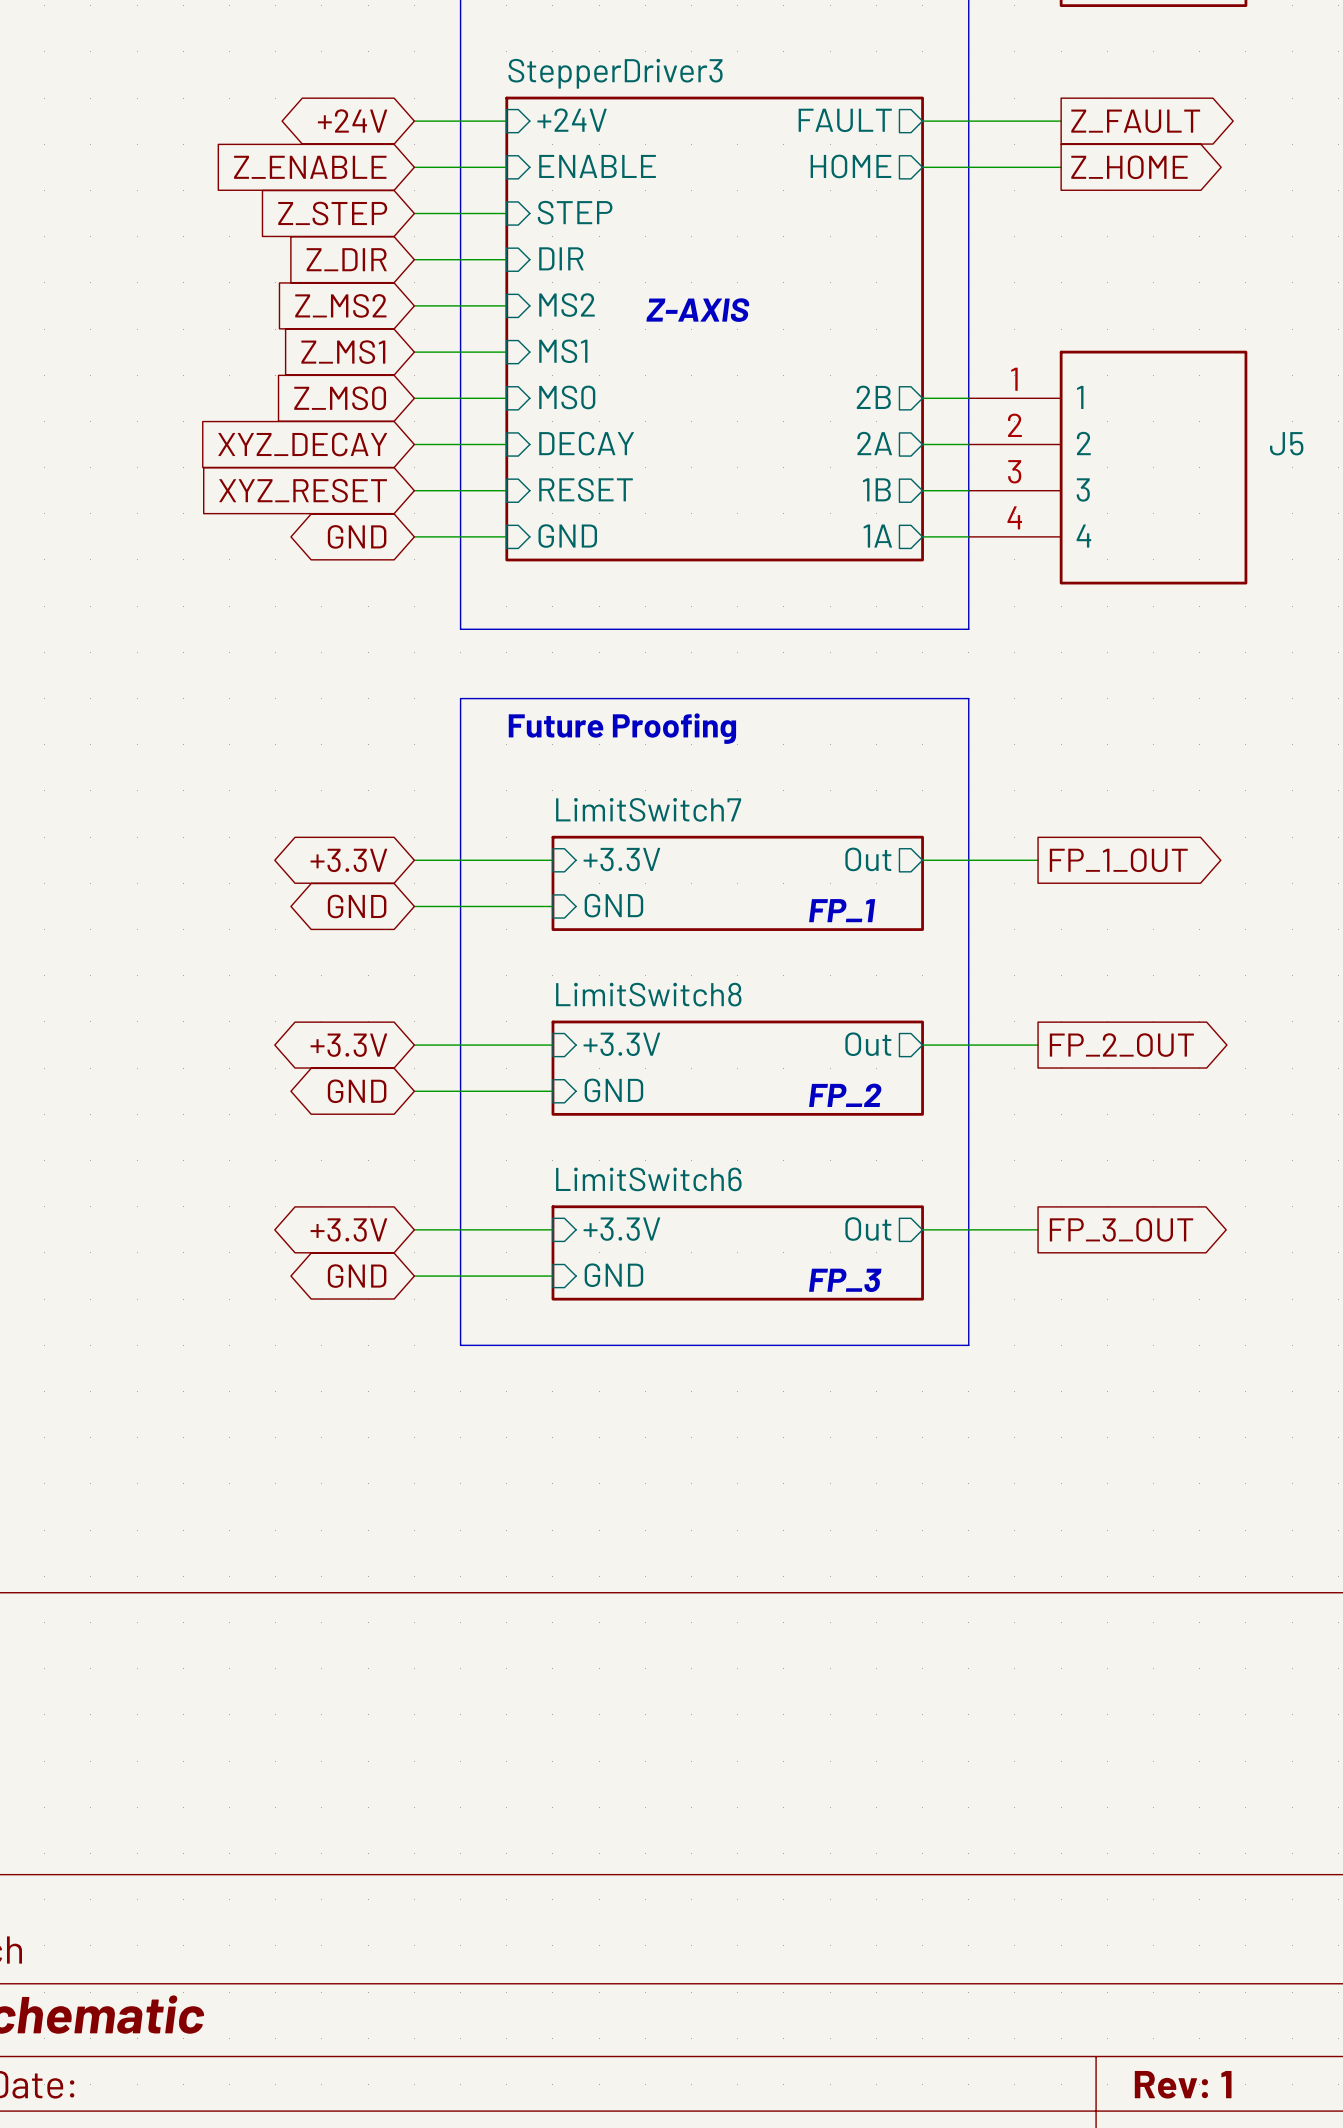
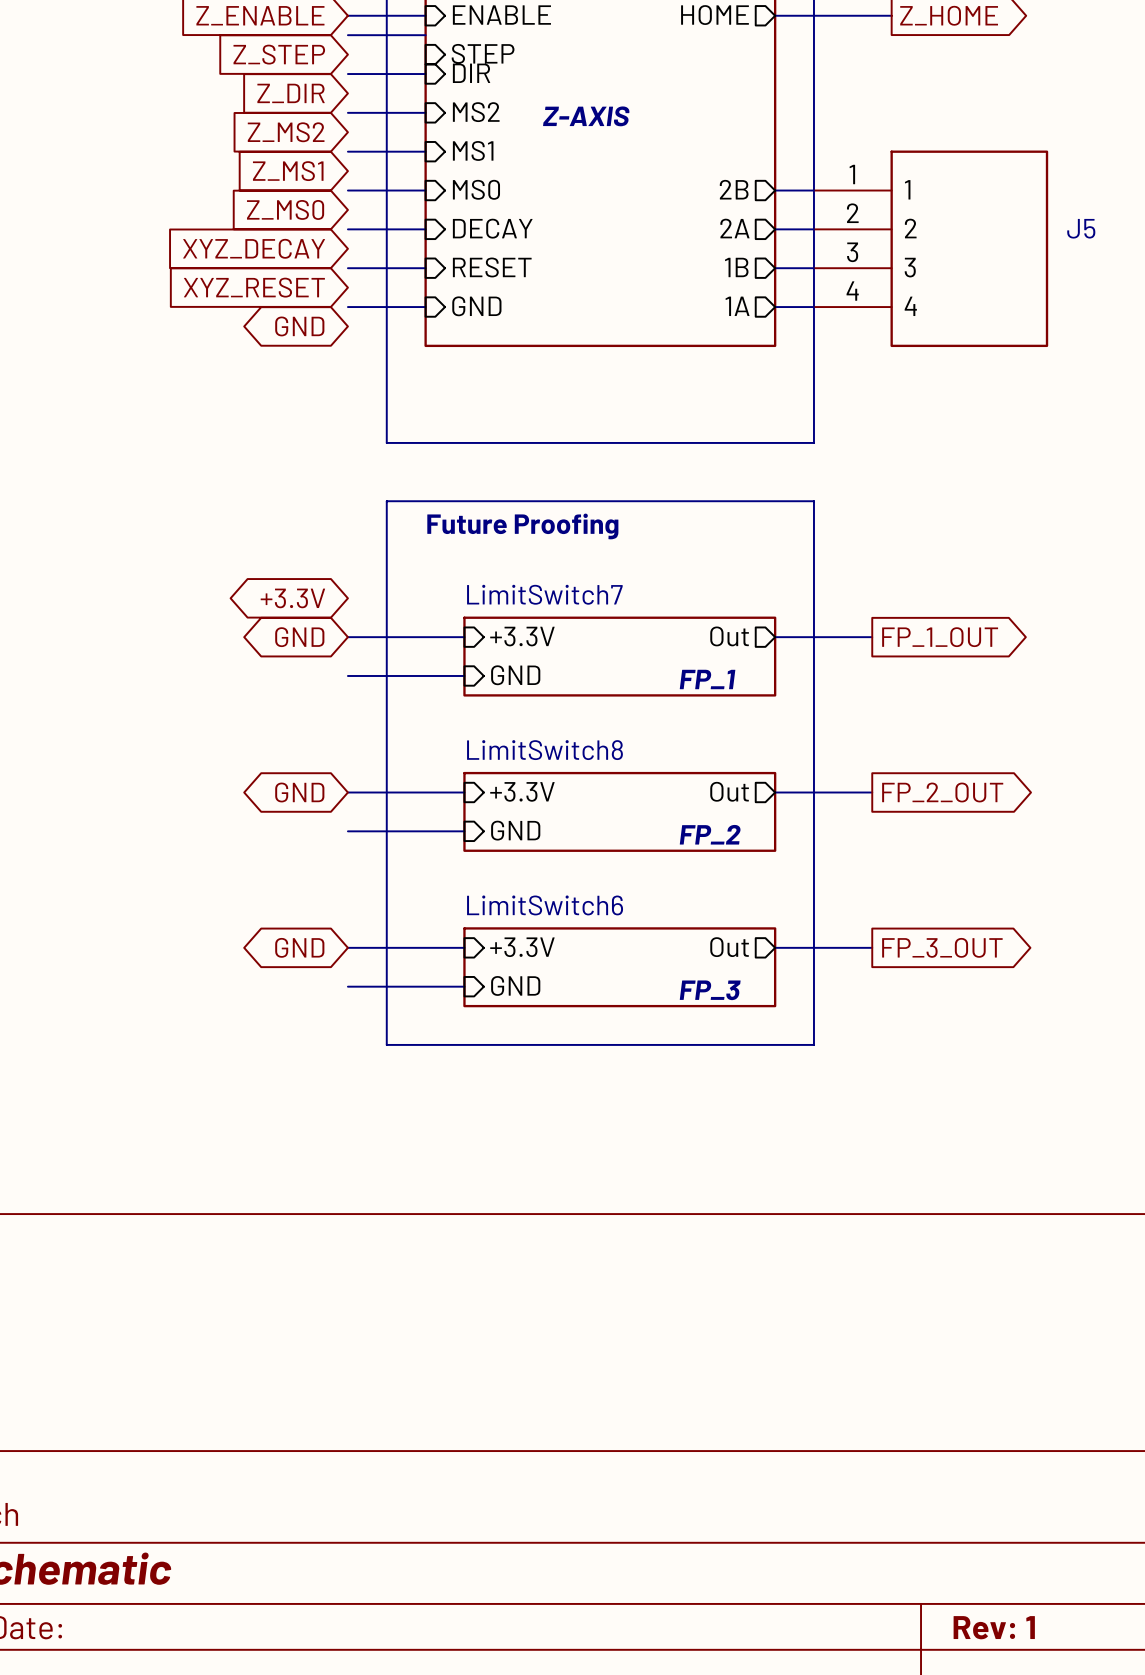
wire: (414, 213) (506, 213) -> (347, 35) (425, 35)
sheet pin position: DIR (561, 258) -> DIR (471, 73)
wire: (414, 259) (506, 259) -> (347, 74) (425, 74)
wire: (414, 305) (506, 305) -> (347, 112) (425, 112)
sheet pin position: MS2 (566, 305) -> MS2 (476, 112)
text position: Z-AXIS (697, 310) -> Z-AXIS (586, 116)
sheet pin position: MS1 (563, 351) -> MS1 (473, 150)
wire: (414, 352) (506, 352) -> (347, 151) (425, 151)
sheet pin position: MS0 (567, 397) -> MS0 (476, 189)
sheet pin position: 2B (873, 397) -> 2B (734, 189)
wire: (414, 398) (506, 398) -> (347, 190) (425, 190)
wire: (922, 398) (968, 398) -> (775, 190) (813, 190)
sheet pin position: DECAY (586, 443) -> DECAY (492, 228)
sheet pin position: 2A (874, 443) -> 2A (734, 228)
wire: (414, 444) (506, 444) -> (347, 229) (425, 229)
wire: (922, 444) (968, 444) -> (775, 229) (813, 229)
J5 position: (1108, 467) -> (931, 248)
sheet pin position: RESET (586, 489) -> RESET (492, 267)
sheet pin position: 1B (876, 489) -> 1B (736, 267)
wire: (414, 490) (506, 490) -> (347, 268) (425, 268)
wire: (922, 490) (968, 490) -> (775, 268) (813, 268)
wire: (414, 536) (506, 536) -> (347, 307) (425, 307)
sheet pin position: GND (567, 536) -> GND (476, 306)
sheet pin position: 1A (877, 536) -> 1A (737, 306)
wire: (922, 536) (968, 536) -> (775, 307) (813, 307)
line: (460, 629) (968, 629) -> (386, 404) (386, 442) (813, 442) (813, 404)
text position: Future Proofing (622, 728) -> Future Proofing (522, 526)
line: (460, 744) (460, 698) (968, 698) (968, 744) -> (386, 501) (813, 501)
sheet pin: +3.3V (621, 859) -> none
sheet pin position: Out (868, 859) -> Out (729, 636)
wire: (414, 860) (552, 860) -> (347, 831) (464, 831)
wire: (922, 860) (1038, 860) -> (775, 947) (872, 947)
global label position: FP_1_OUT (1118, 860) -> FP_1_OUT (940, 637)
sheet LimitSwitch7 position: (737, 883) -> (619, 656)
sheet pin: GND (613, 905) -> +3.3V (522, 636)
text position: FP_1 (842, 910) -> FP_1 (707, 679)
sheet pin: none -> GND (515, 675)
sheet pin: +3.3V (621, 1044) -> none
sheet pin position: Out (868, 1044) -> Out (729, 791)
global label: +3.3V (348, 1045) -> none
wire: (414, 1045) (552, 1045) -> (347, 986) (464, 986)
wire: (922, 1045) (1038, 1045) -> (775, 792) (872, 792)
global label position: FP_2_OUT (1121, 1045) -> FP_2_OUT (942, 792)
sheet LimitSwitch8 position: (737, 1068) -> (619, 811)
sheet pin: GND (613, 1090) -> +3.3V (522, 791)
text position: FP_2 (845, 1095) -> FP_2 (710, 834)
sheet pin: none -> GND (515, 830)
global label: +3.3V (348, 1229) -> none
wire: (414, 1229) (552, 1229) -> (347, 675) (464, 675)
sheet pin: +3.3V (621, 1229) -> none
sheet pin position: Out (868, 1229) -> Out (729, 947)
wire: (922, 1229) (1038, 1229) -> (775, 637) (872, 637)
global label position: FP_3_OUT (1121, 1229) -> FP_3_OUT (942, 947)
sheet LimitSwitch6 position: (737, 1252) -> (619, 967)
sheet pin: GND (613, 1275) -> +3.3V (522, 947)
text position: FP_3 (845, 1280) -> FP_3 (710, 990)
sheet pin: none -> GND (515, 985)
line: (460, 1345) (968, 1345) -> (386, 1006) (386, 1044) (813, 1044) (813, 1006)

